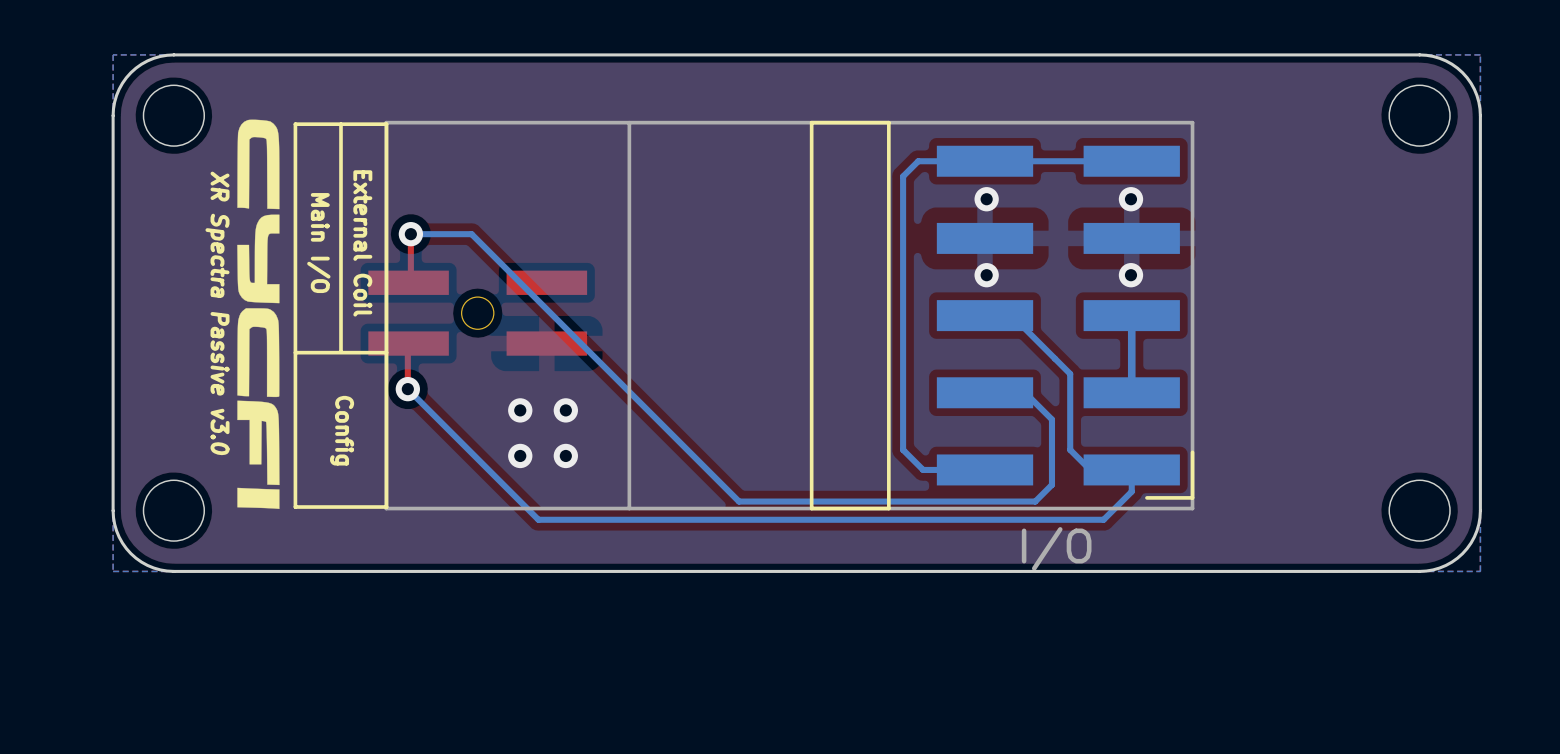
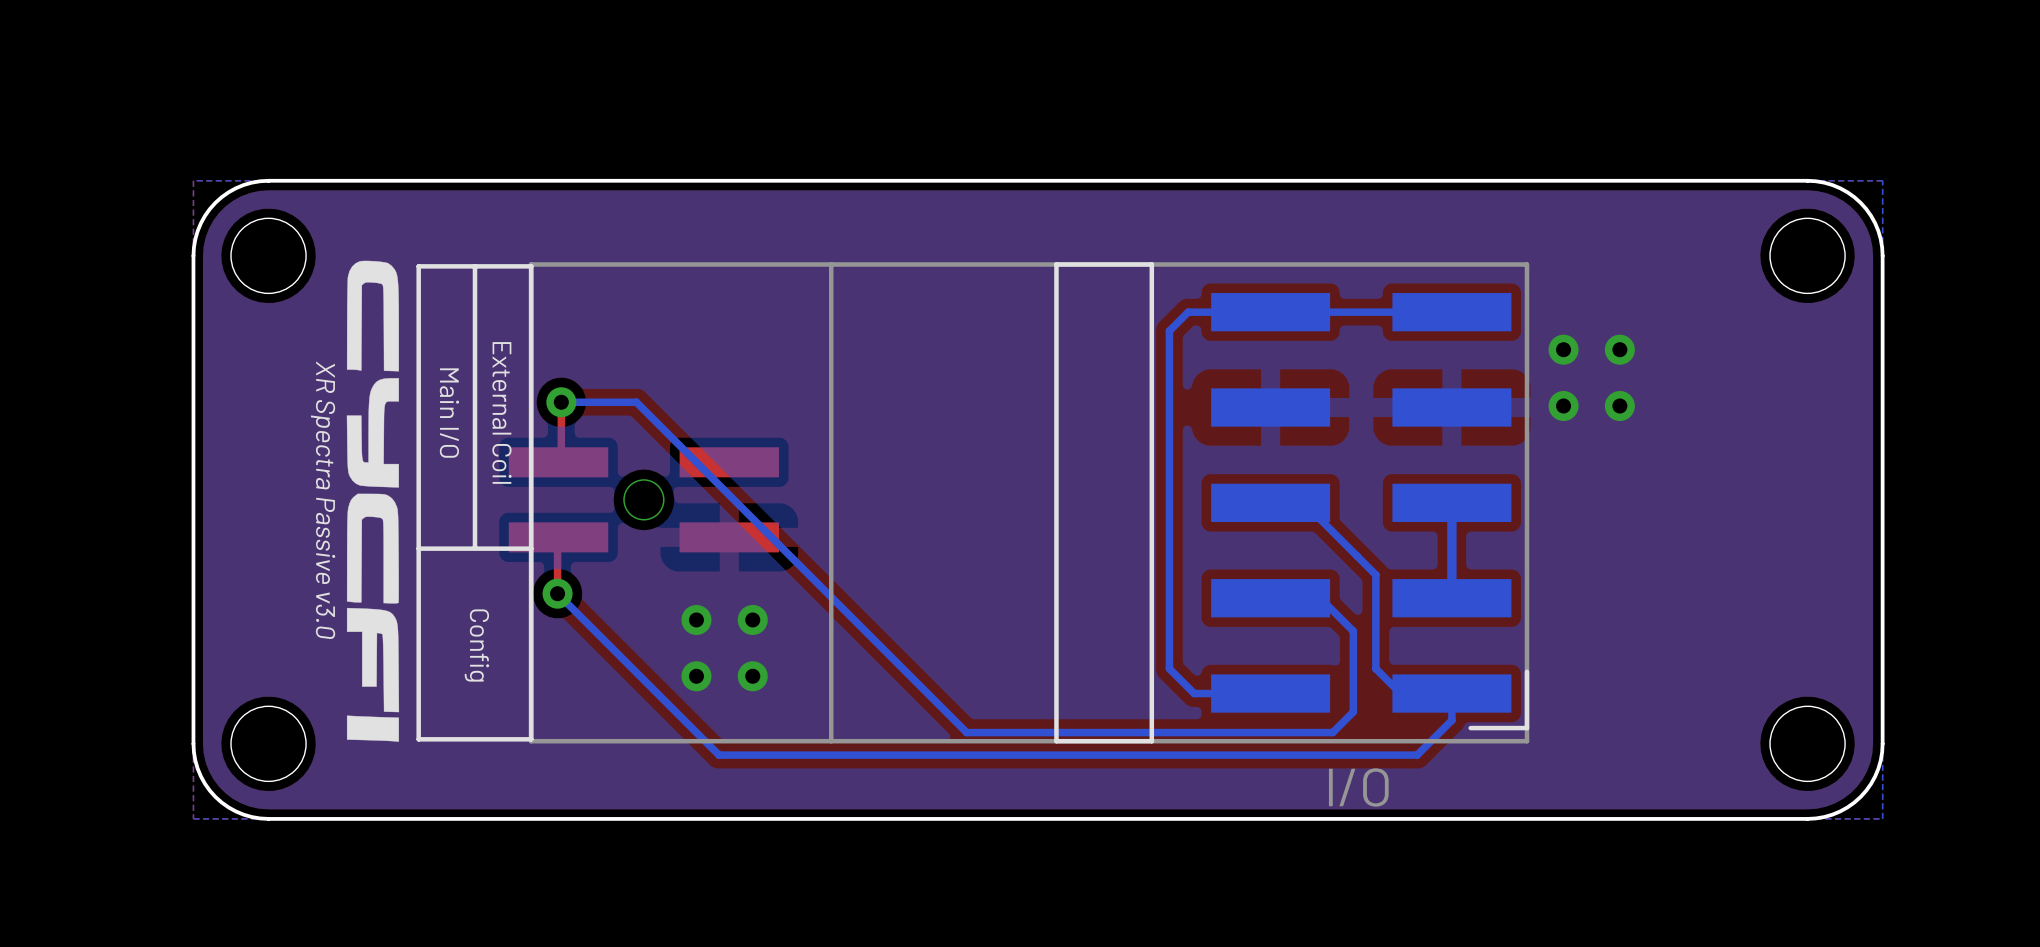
via: none -> (1563, 349)
via: none -> (1619, 349)
via: (986, 199) -> none
via: (1130, 199) -> none
via: none -> (1563, 406)
via: none -> (1619, 406)
via: (986, 275) -> none
via: (1130, 275) -> none

